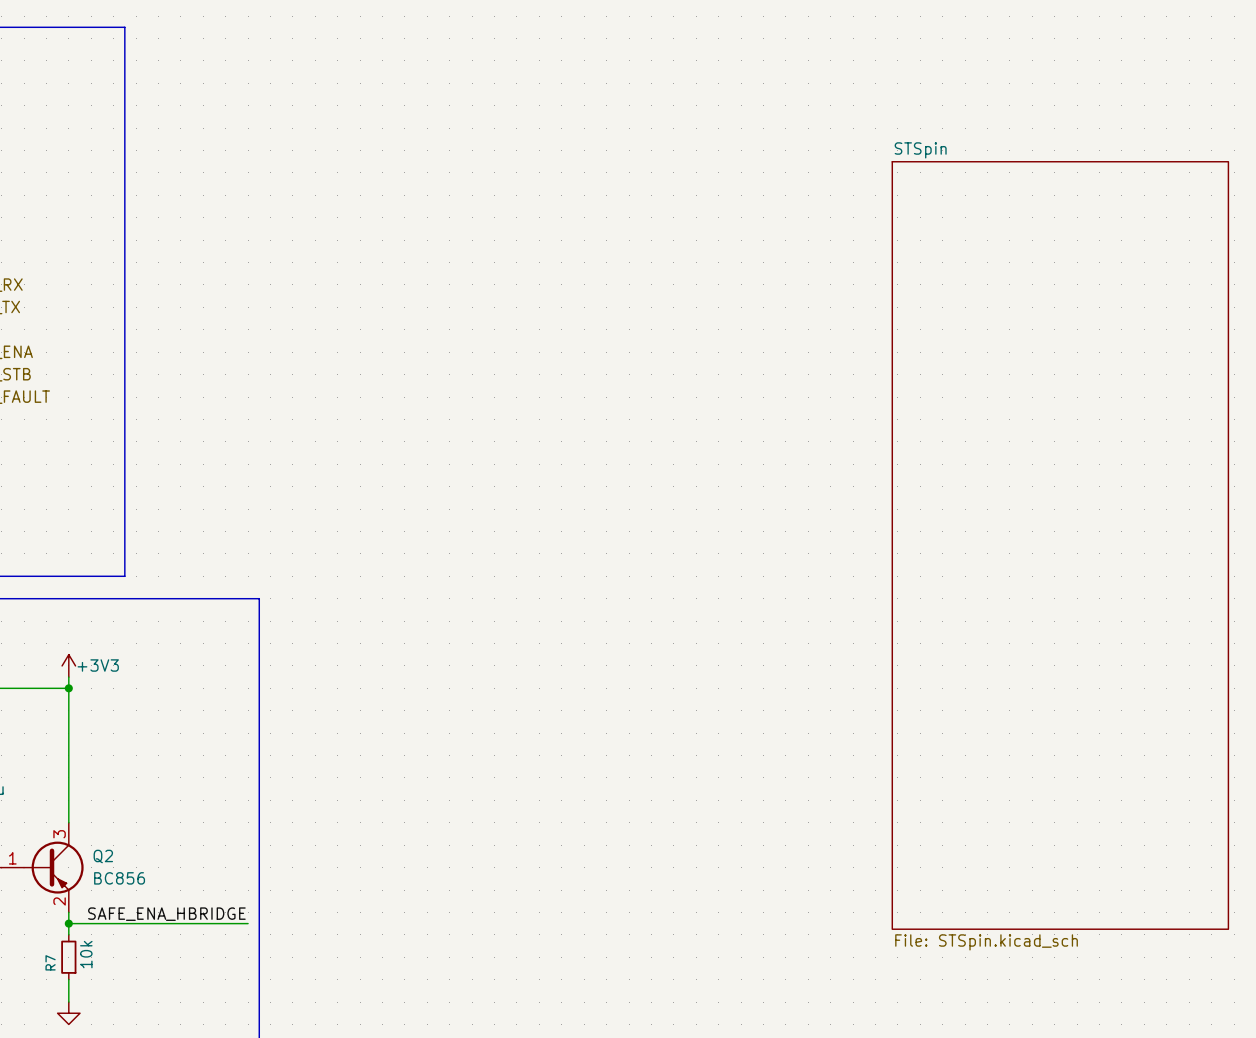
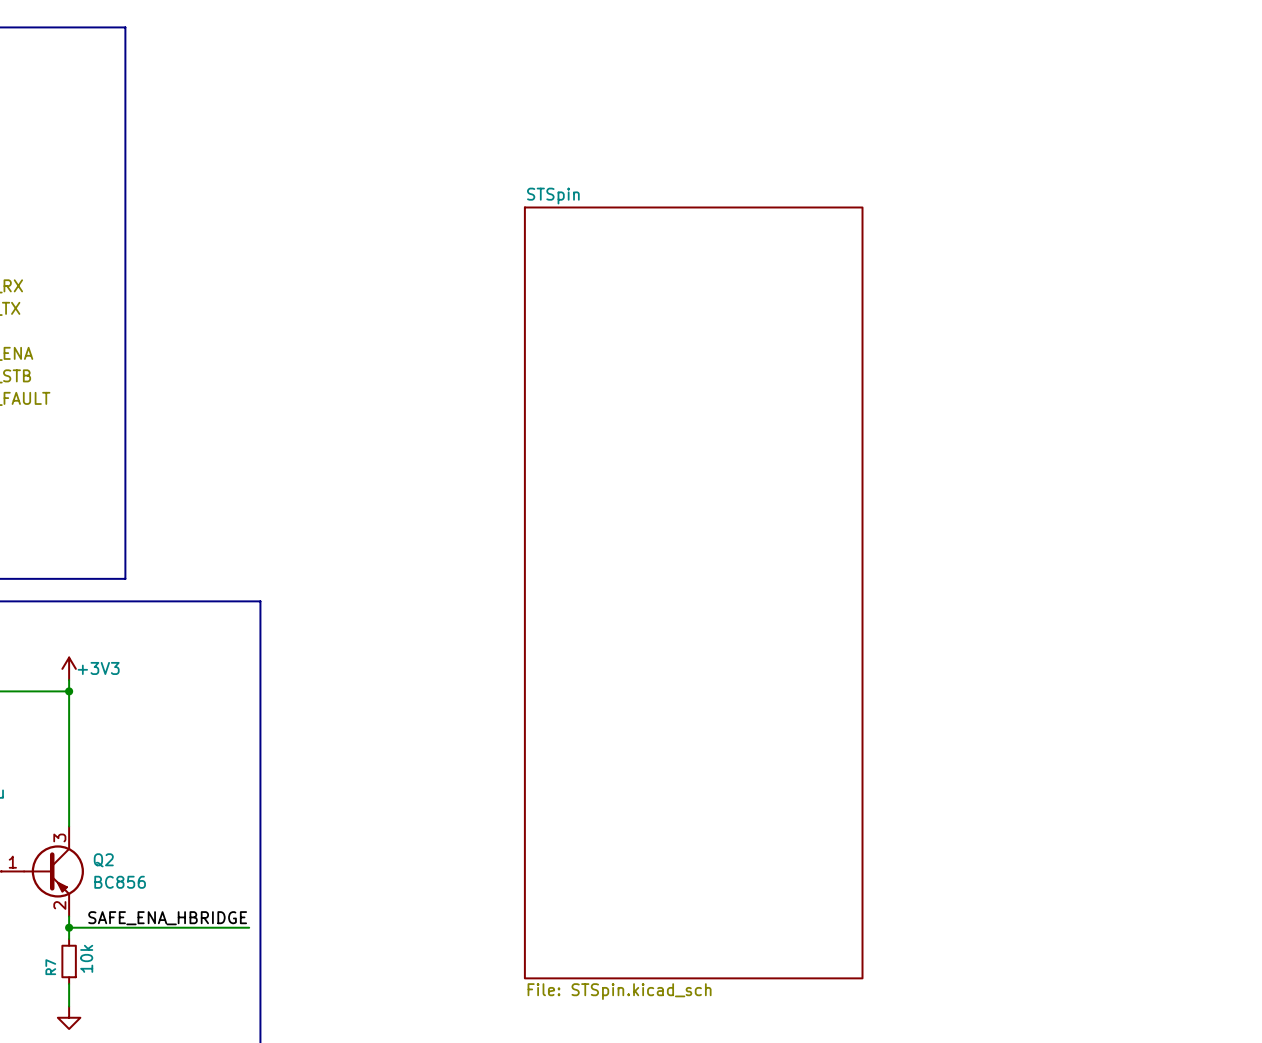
sheet STSpin: File: STSpin.kicad_sch (1060, 545) -> none
sheet STSpin: none -> File: STSpin.kicad_sch (693, 592)

